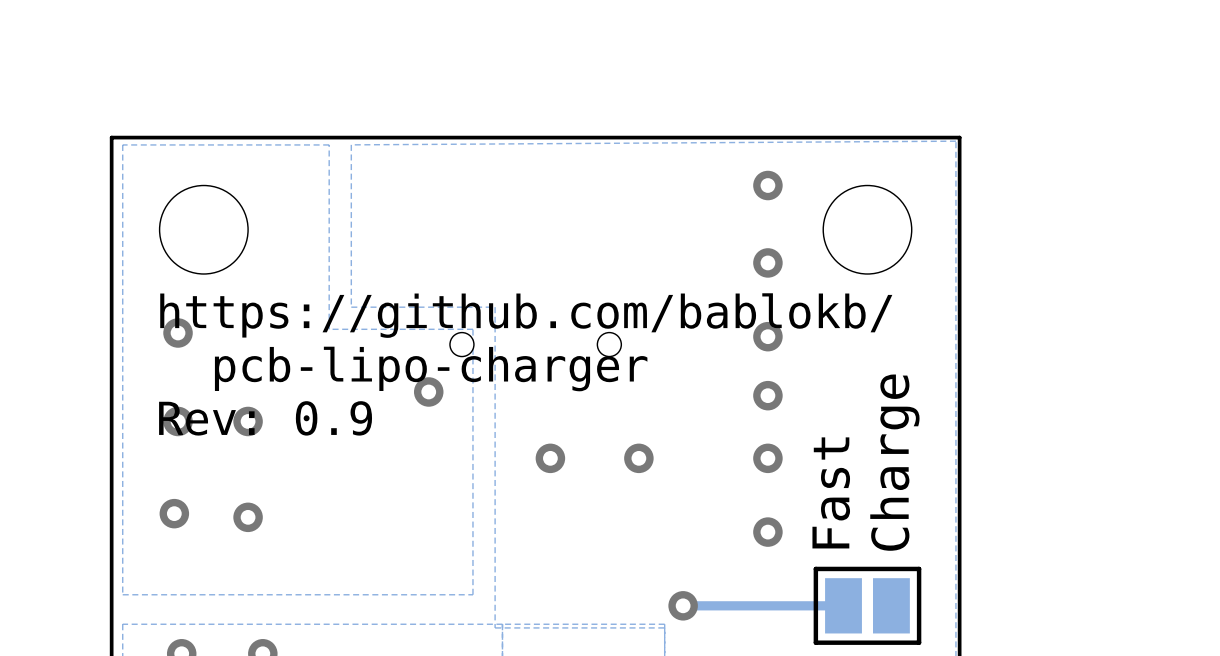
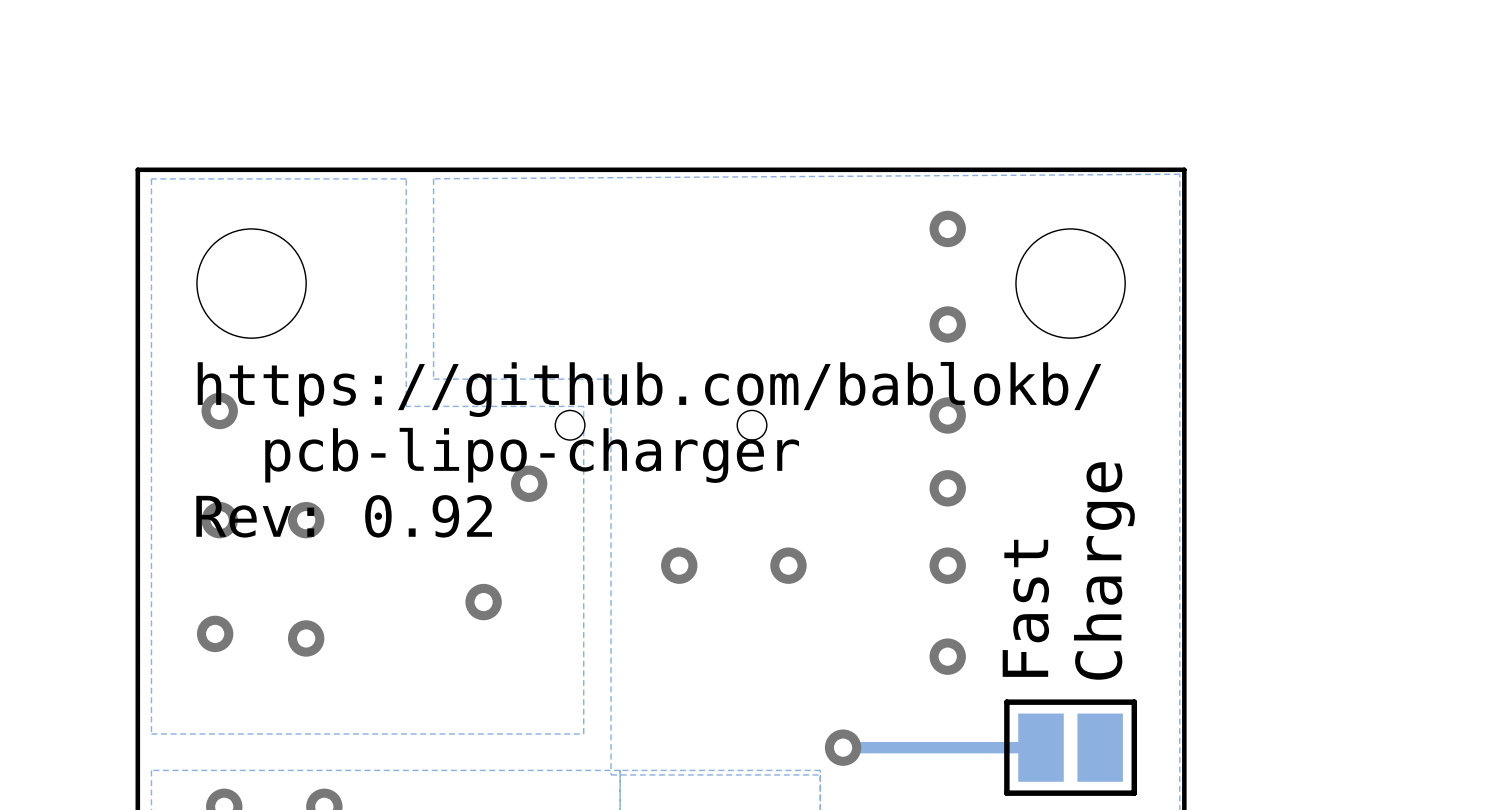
text: Rev: 0.9 (265, 418) -> Rev: 0.92 (344, 516)
via: none -> (483, 602)

